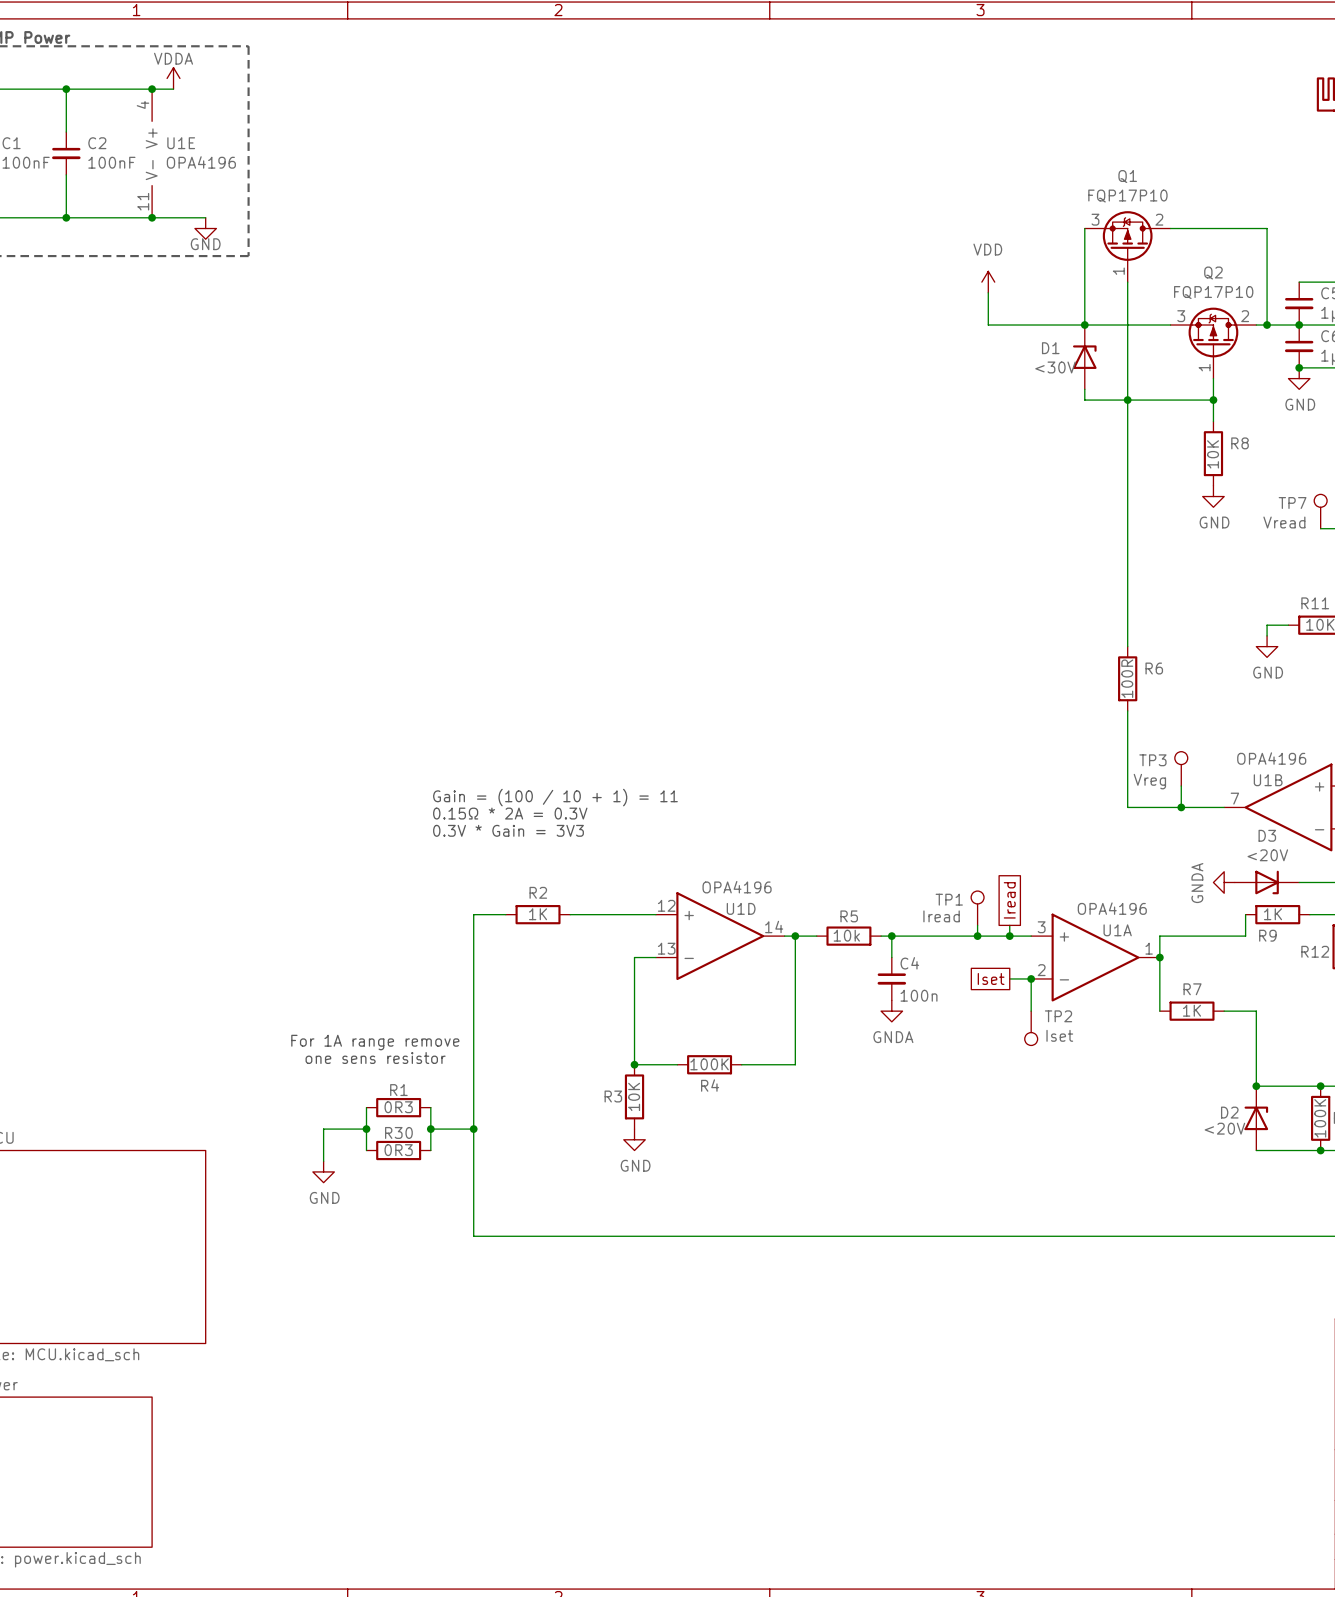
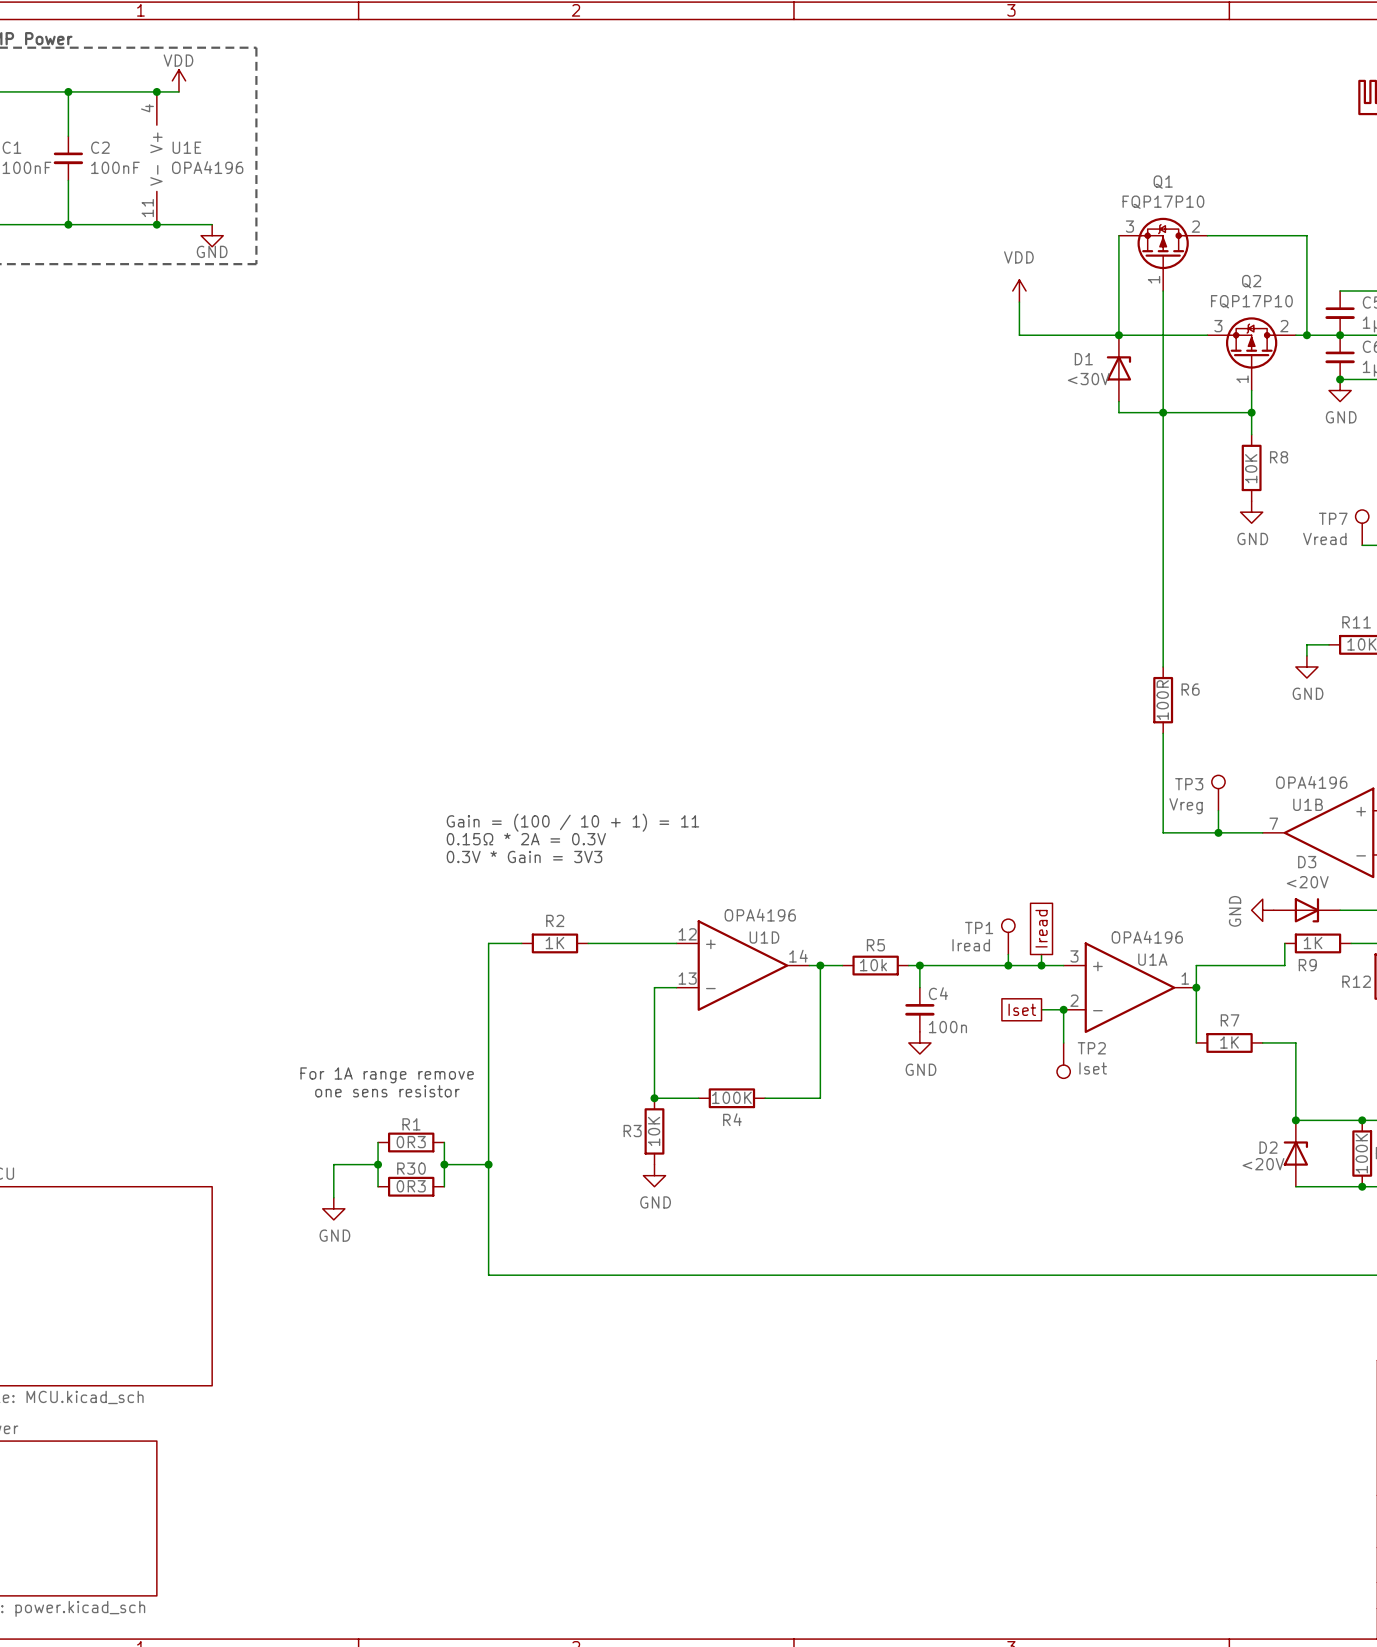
power symbol: VDDA (173, 78) -> VDD (178, 80)
power symbol: GNDA (1224, 882) -> GND (1262, 910)
power symbol: GNDA (891, 1011) -> GND (919, 1042)

